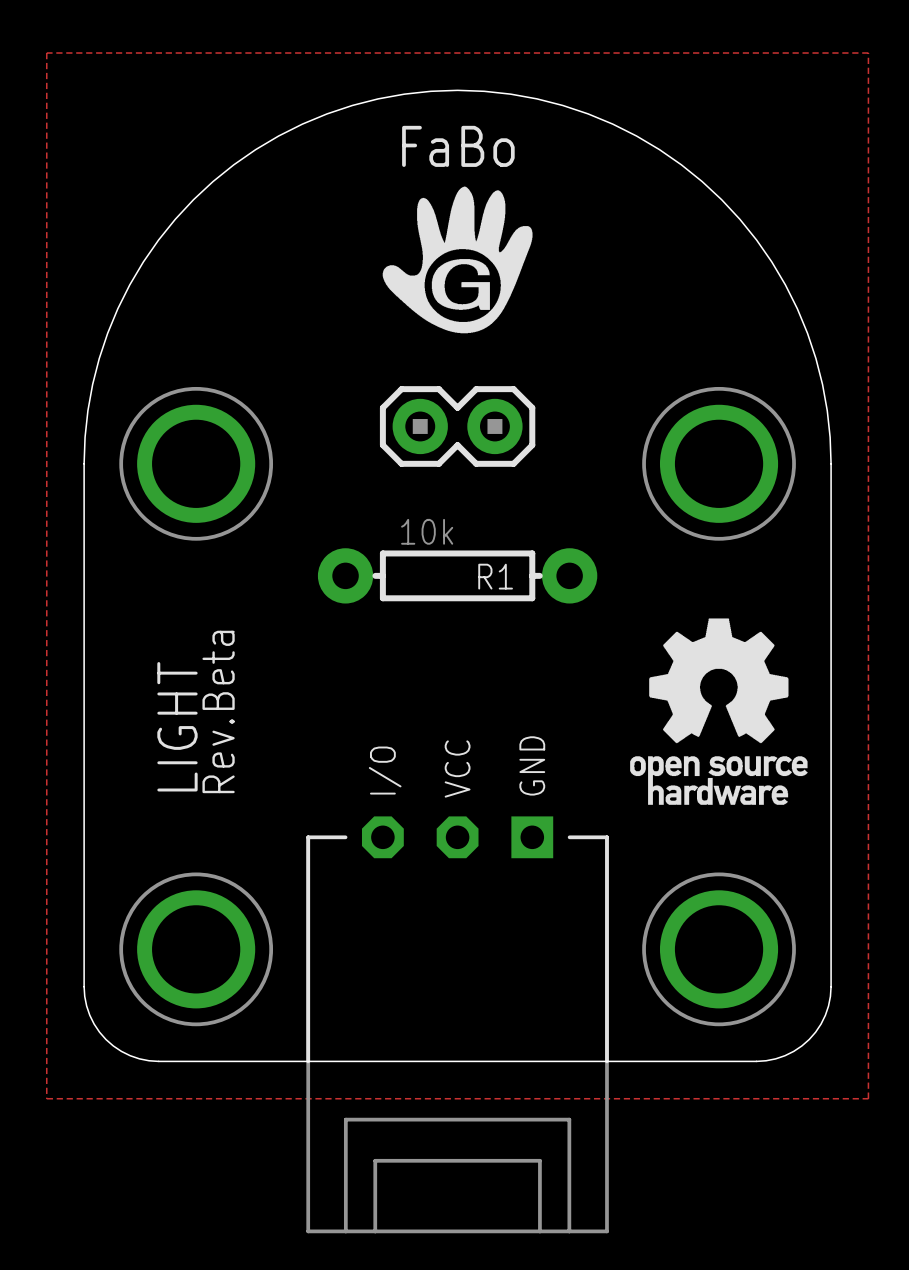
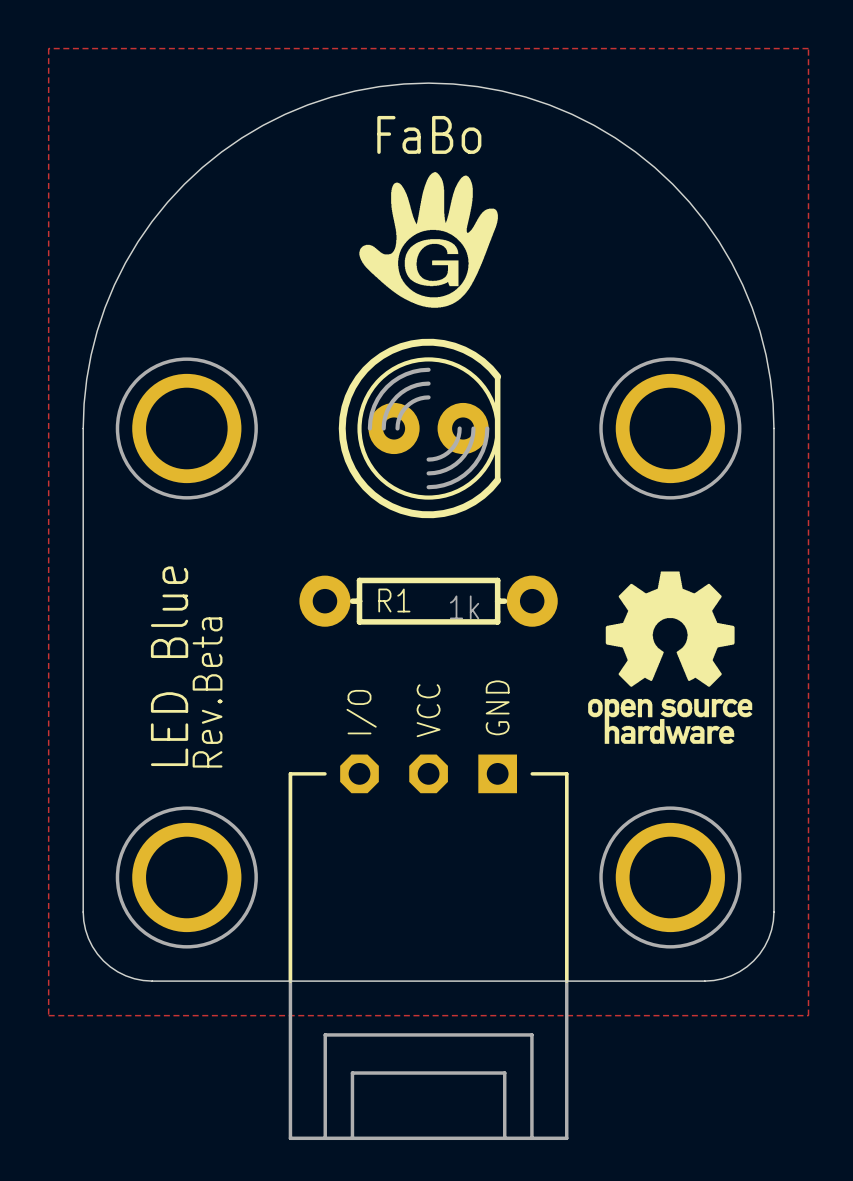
part: (457, 426) -> none
part: none -> (419, 428)
R1 value: 10k (427, 531) -> 1k (464, 607)
R1 position: (457, 575) -> (428, 601)
R1 name position: R1 (495, 576) -> R1 (394, 600)
text position: Rev.Beta (218, 711) -> Rev.Beta (207, 692)
text: none -> LED Blue (169, 666)
text: LIGHT (177, 726) -> none

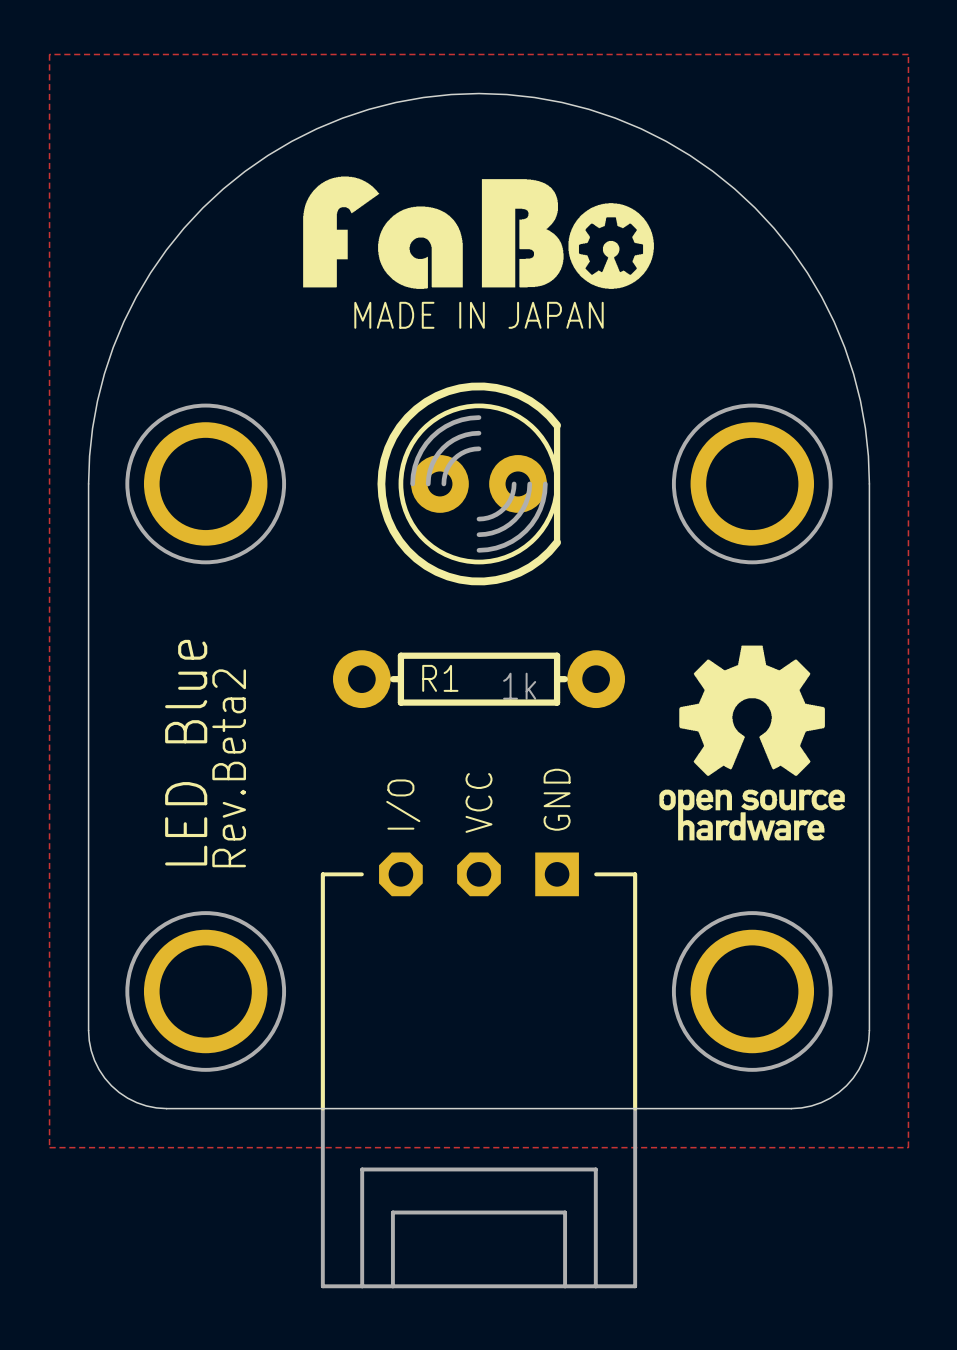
drawing: none -> [303, 176, 654, 289]
drawing: [359, 172, 498, 308] -> none
text: none -> MADE IN JAPAN (479, 315)
text: Rev.Beta (207, 692) -> Rev.Beta2 (229, 768)

